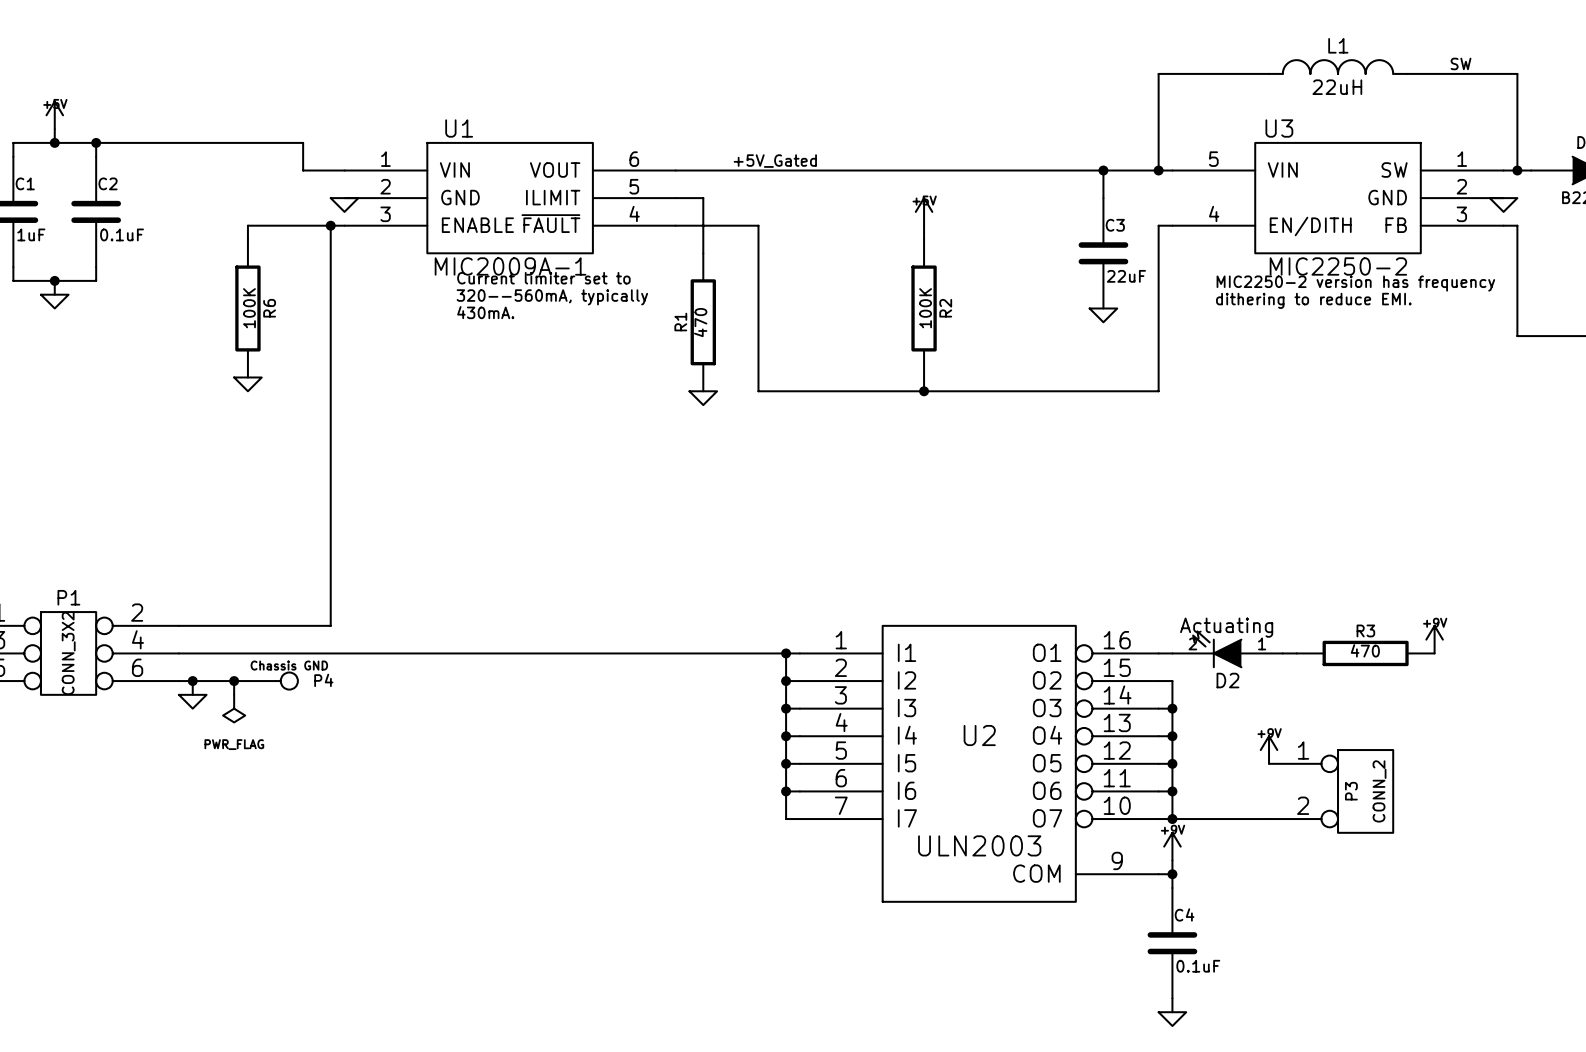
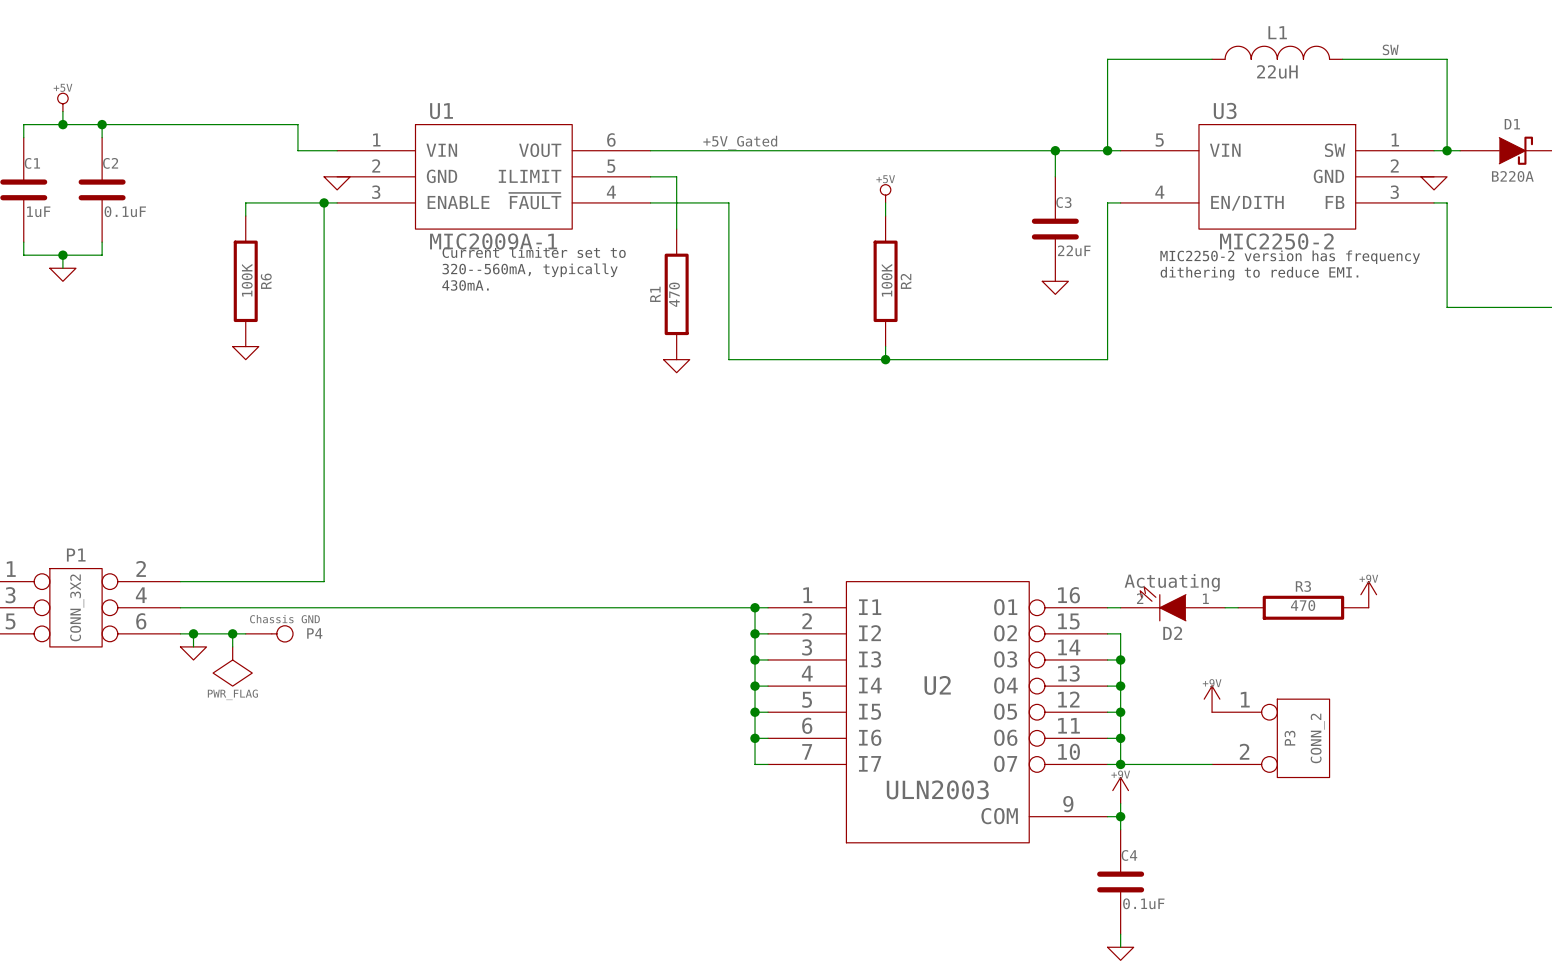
power symbol shape: [46, 101, 64, 130] -> [57, 93, 69, 112]
power symbol shape: [915, 198, 933, 226] -> [880, 184, 891, 203]
power symbol shape: [223, 694, 246, 723] -> [213, 646, 253, 687]

